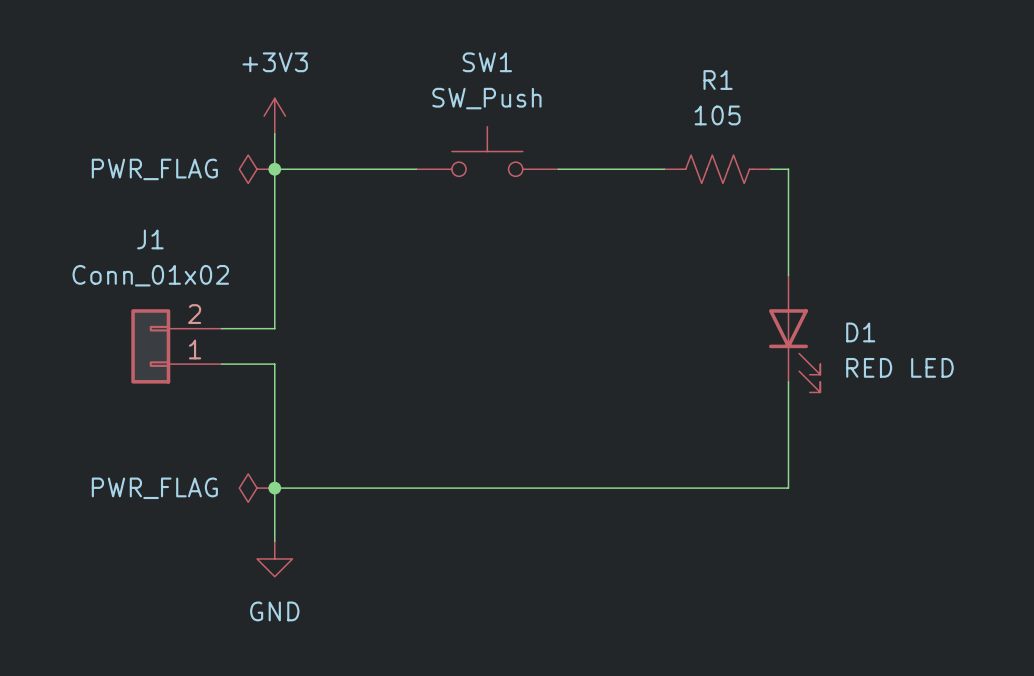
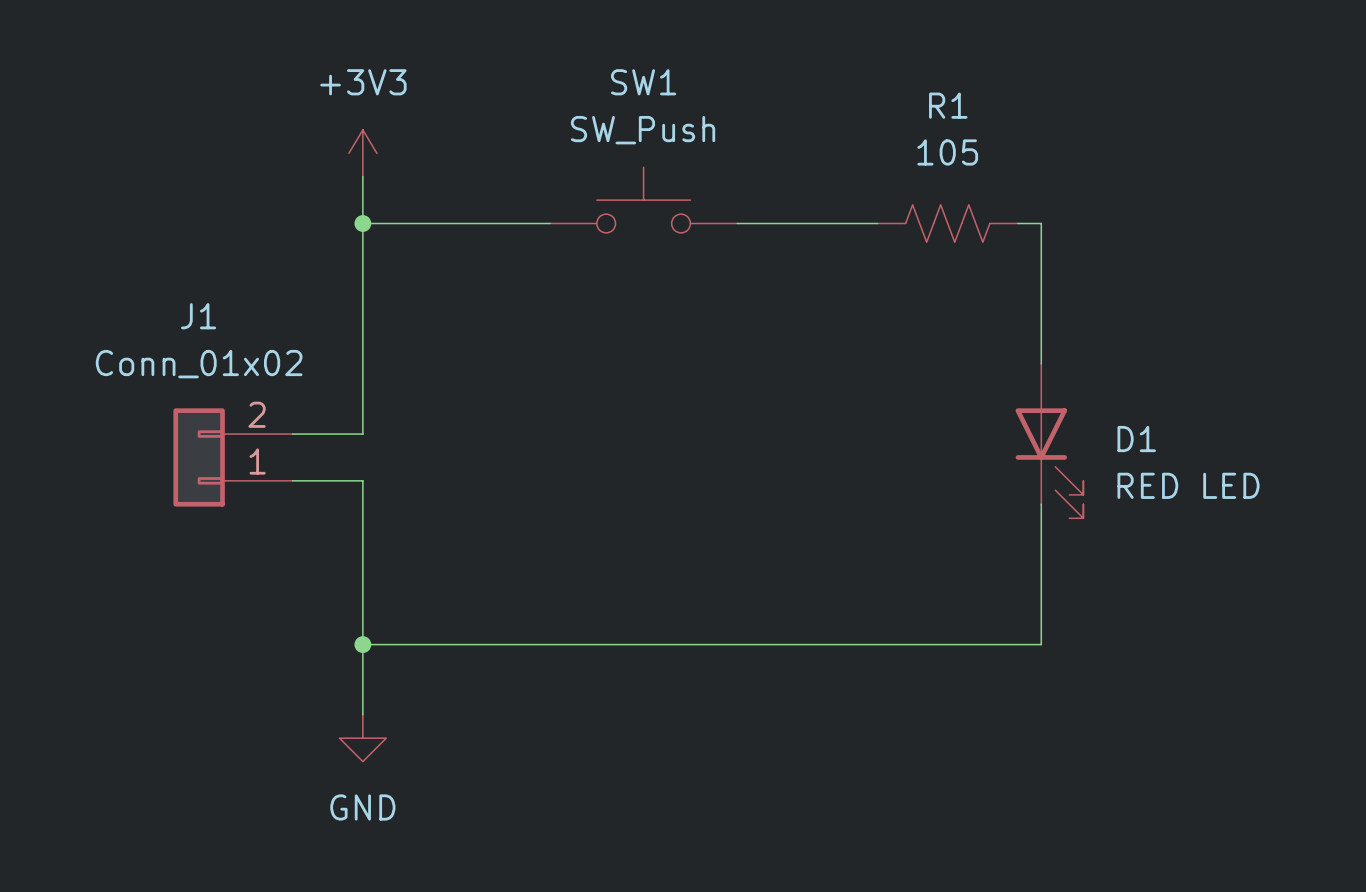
power symbol: PWR_FLAG (257, 169) -> none
power symbol: PWR_FLAG (257, 488) -> none

